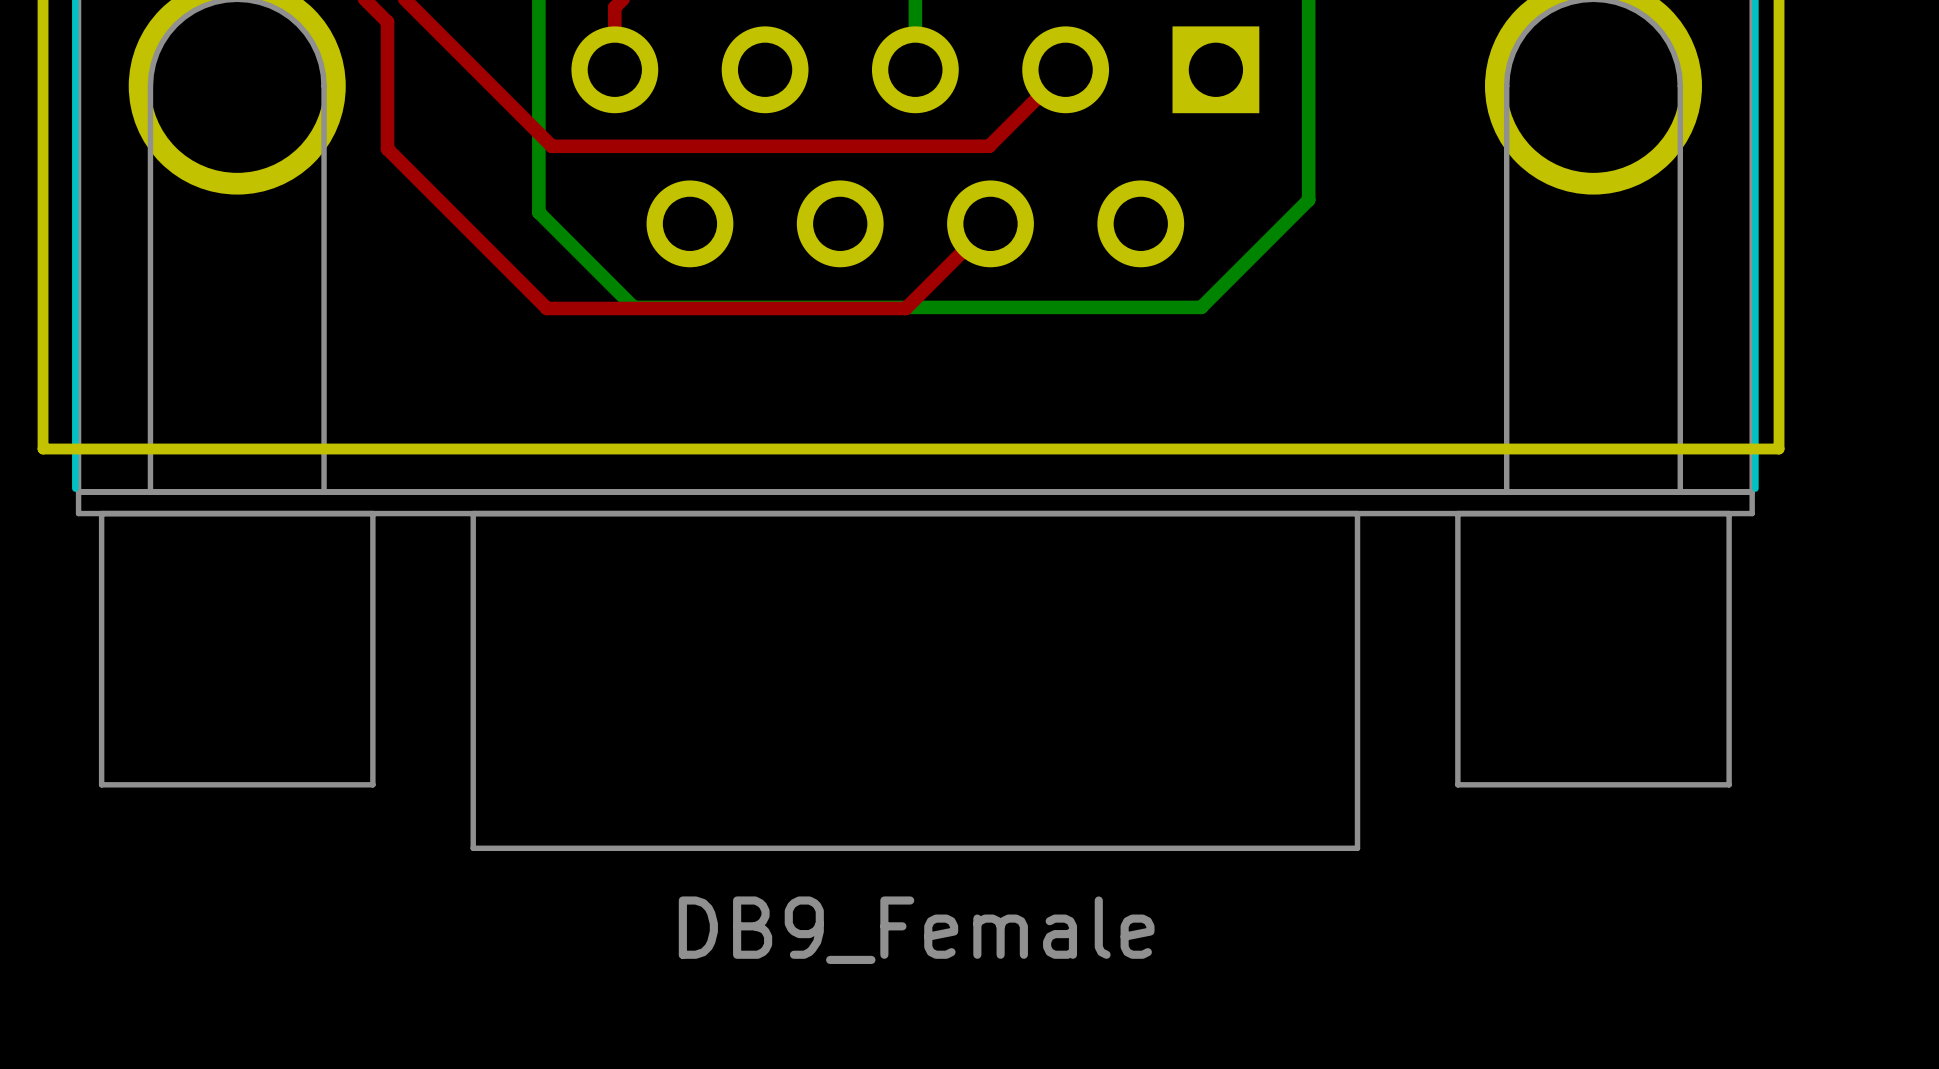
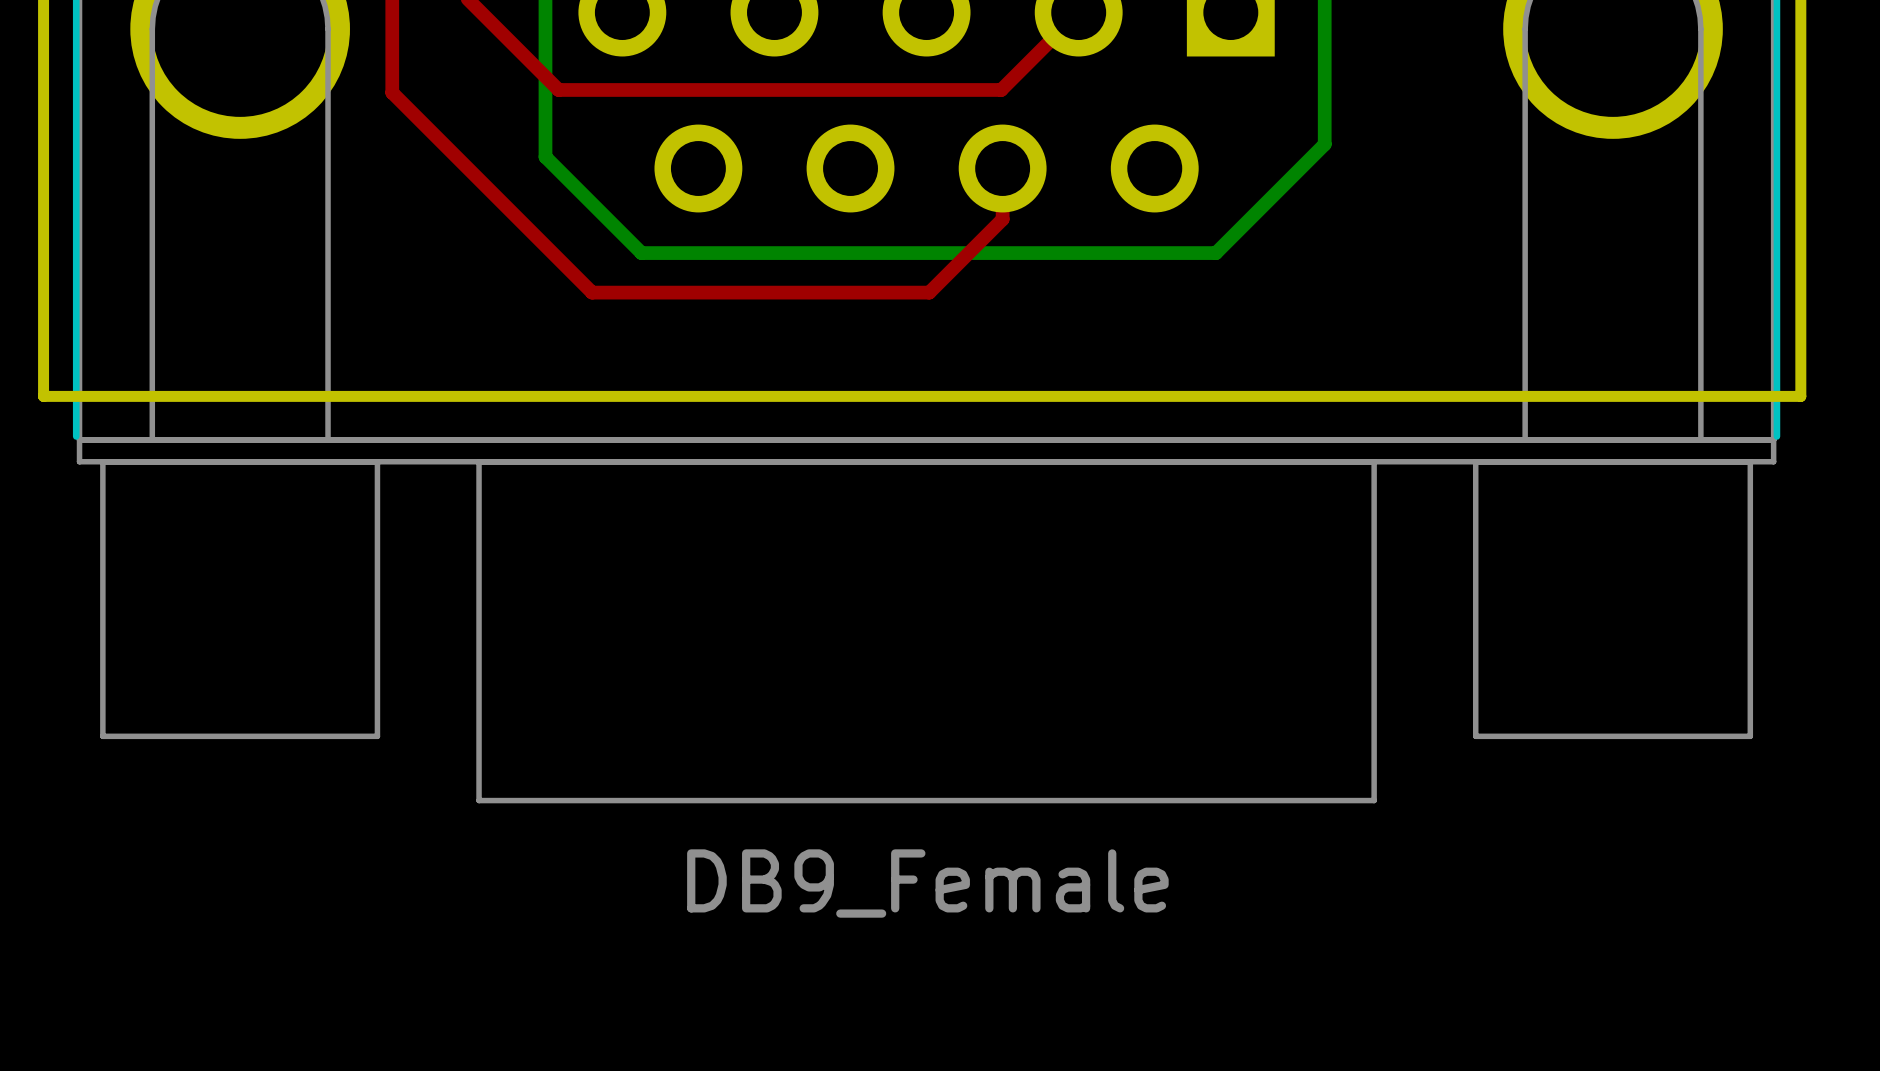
top track: (990, 223) (905, 308) (547, 308) -> (1002, 168) (1002, 219) (929, 292) (592, 292) (553, 254)

